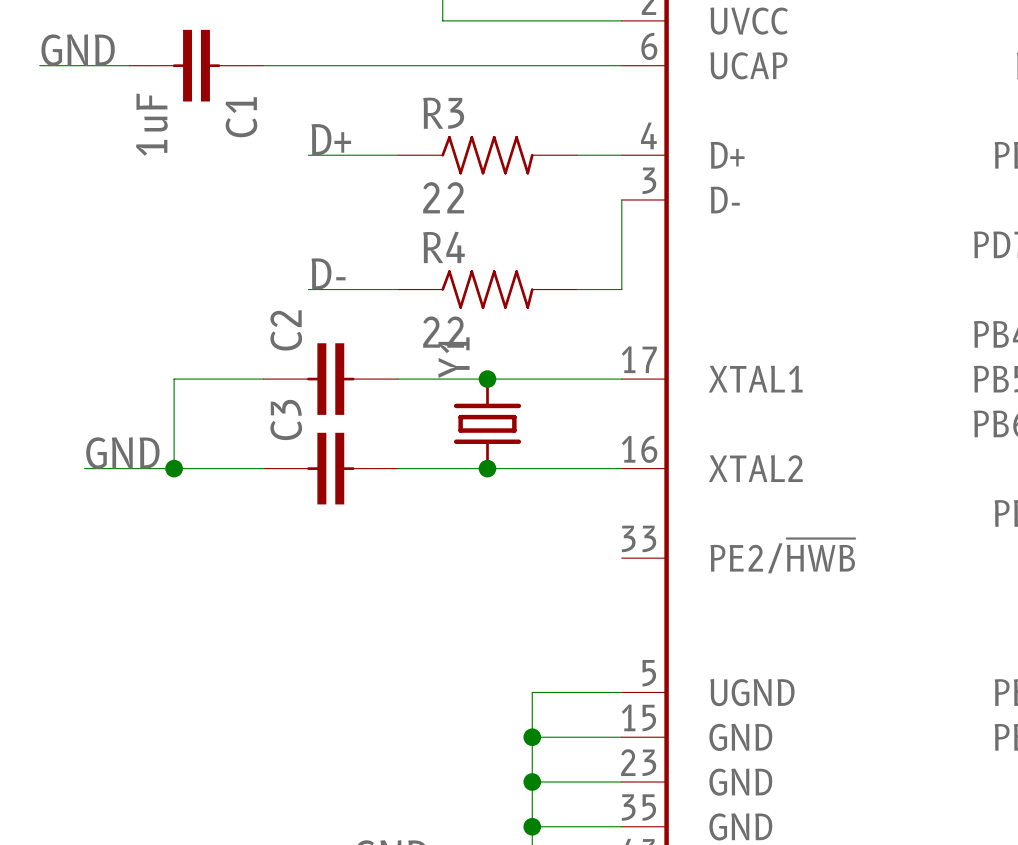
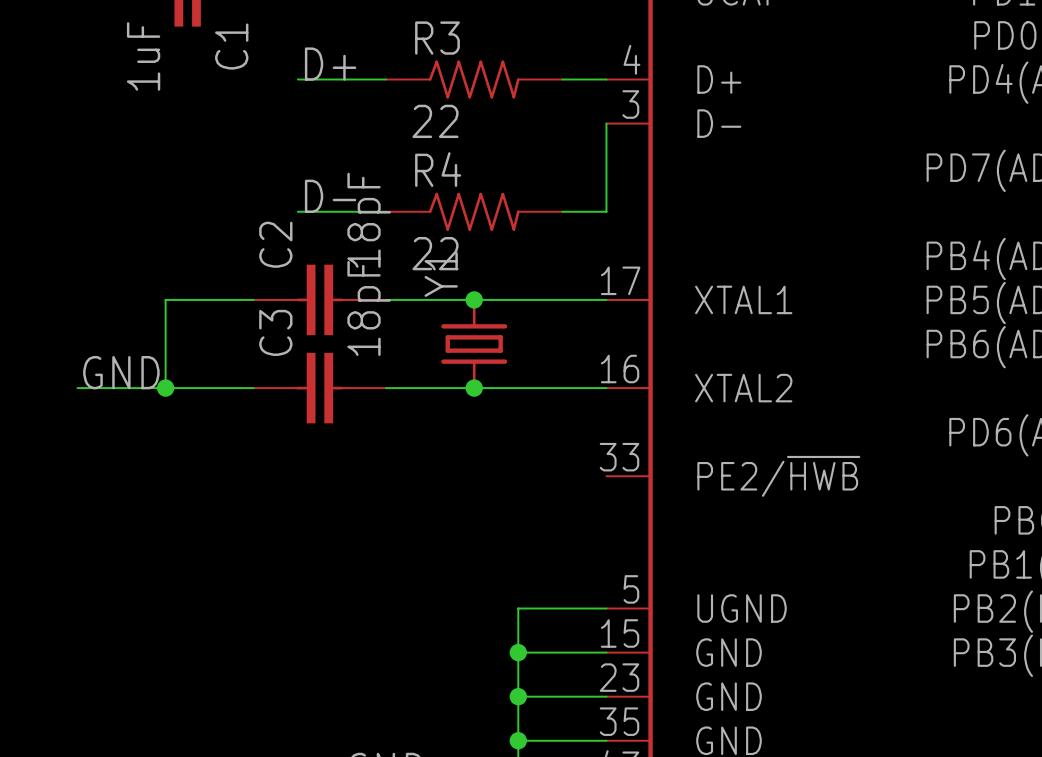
C2 value: none -> 18pF (369, 220)
C3 value: none -> 18pF (369, 308)

